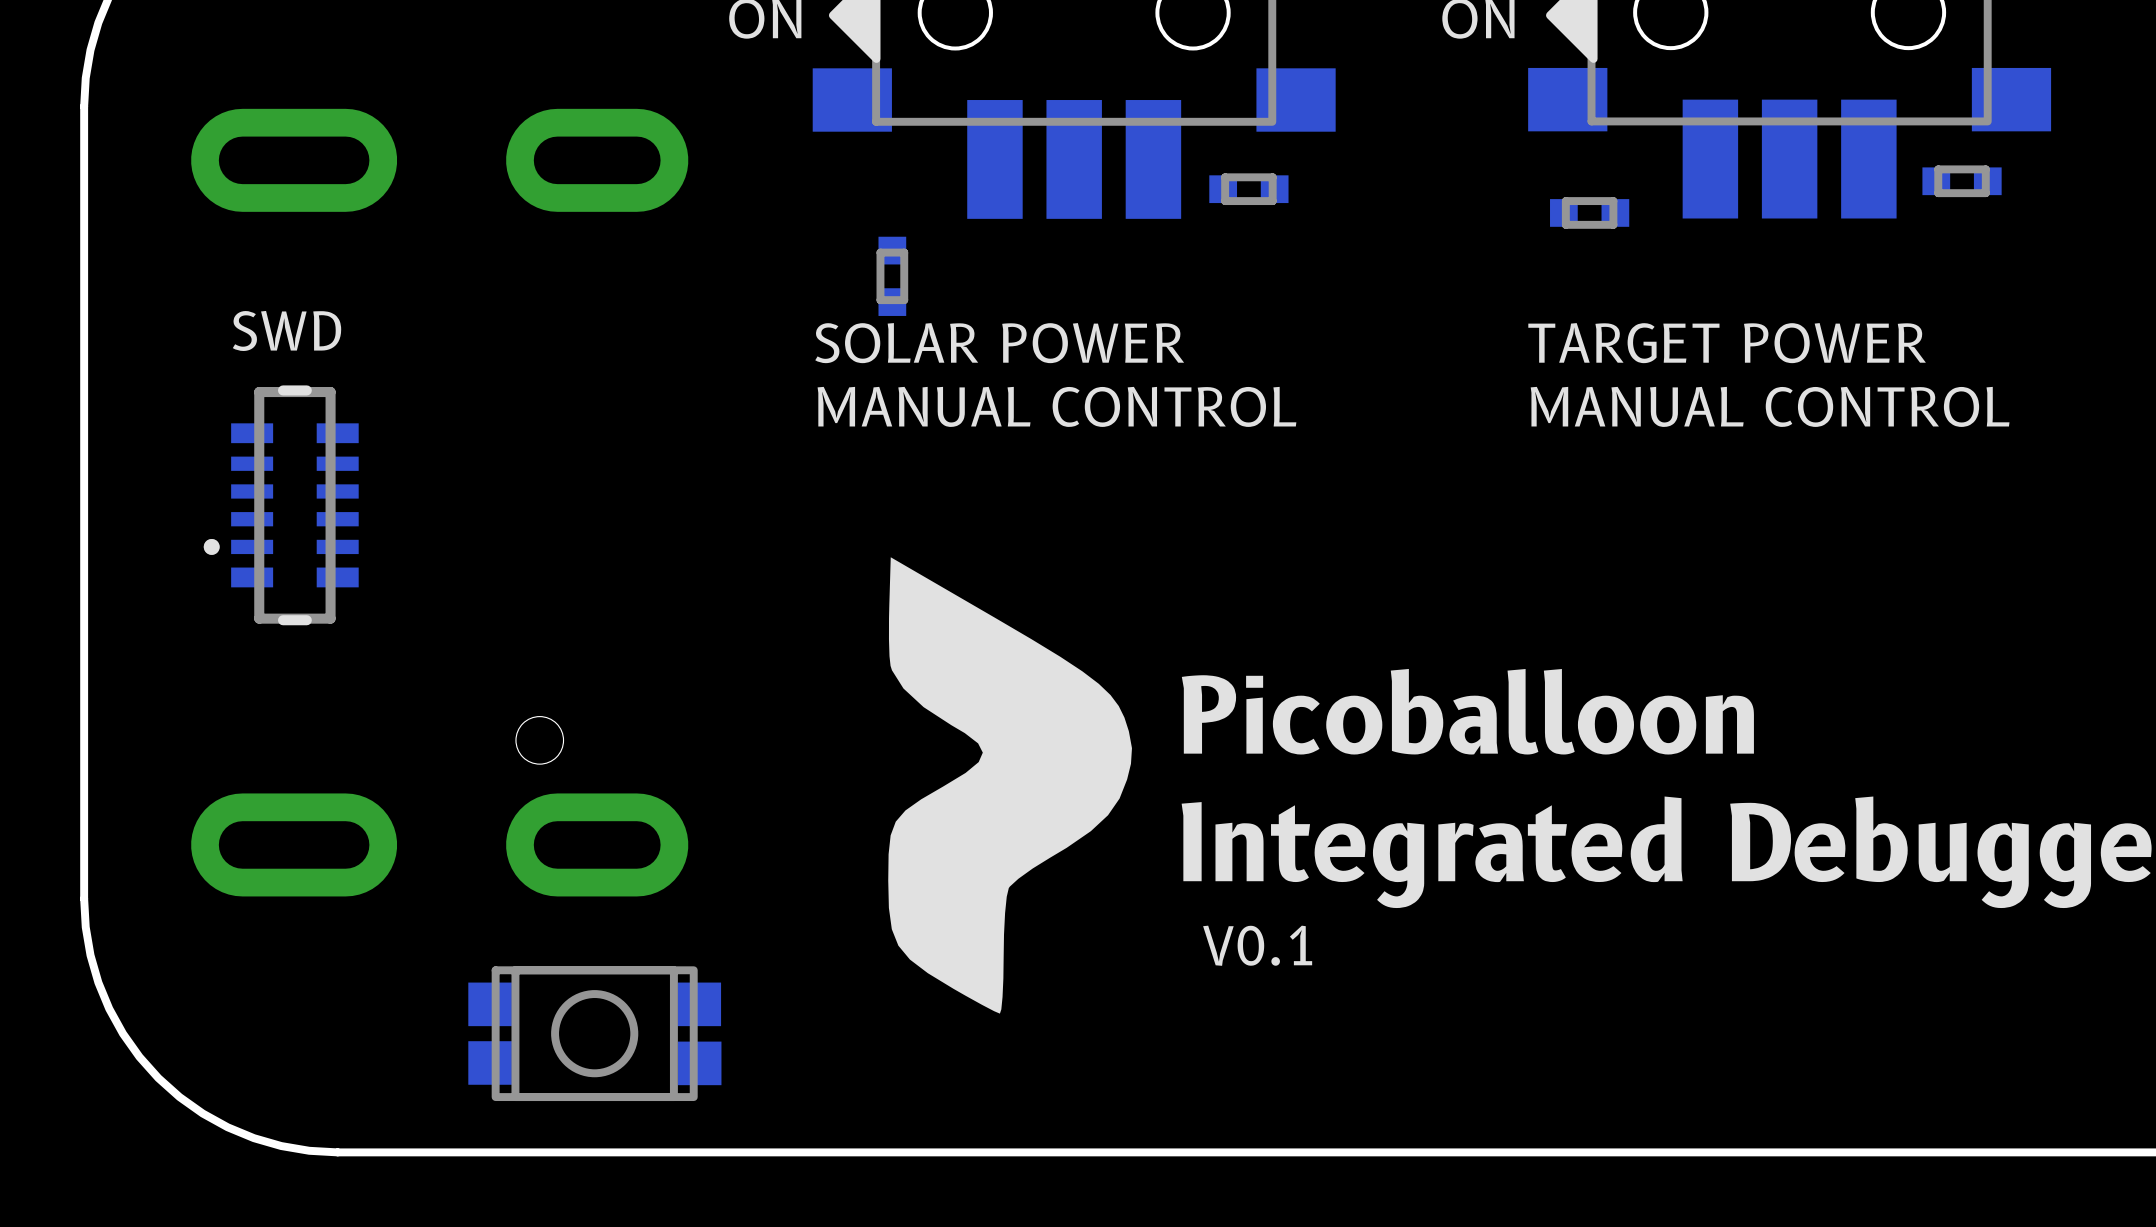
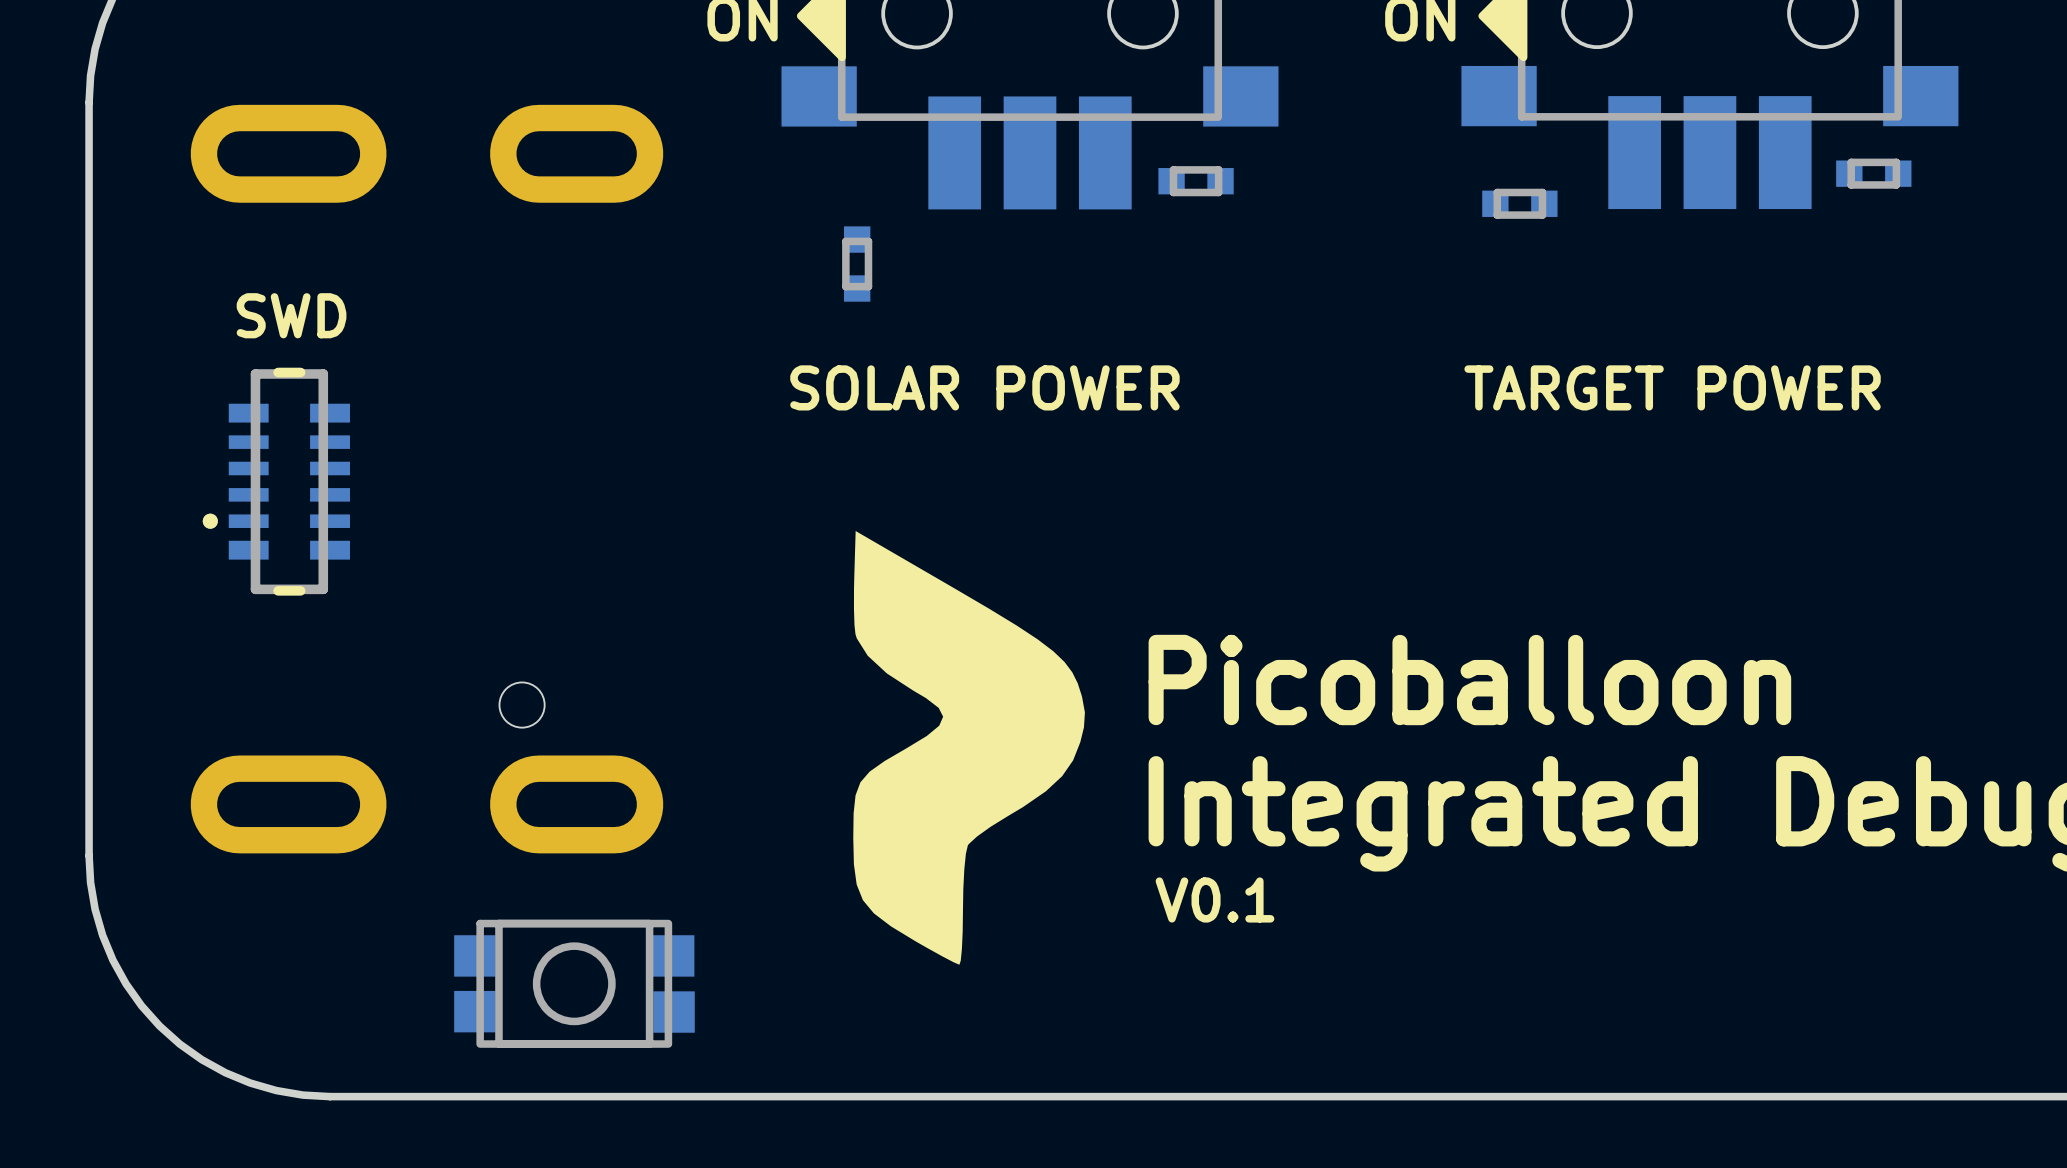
text position: SOLAR POWER (999, 343) -> SOLAR POWER (984, 387)
text position: TARGET POWER (1727, 343) -> TARGET POWER (1672, 387)
text: MANUAL CONTROL (1056, 406) -> none
text: MANUAL CONTROL (1770, 406) -> none

